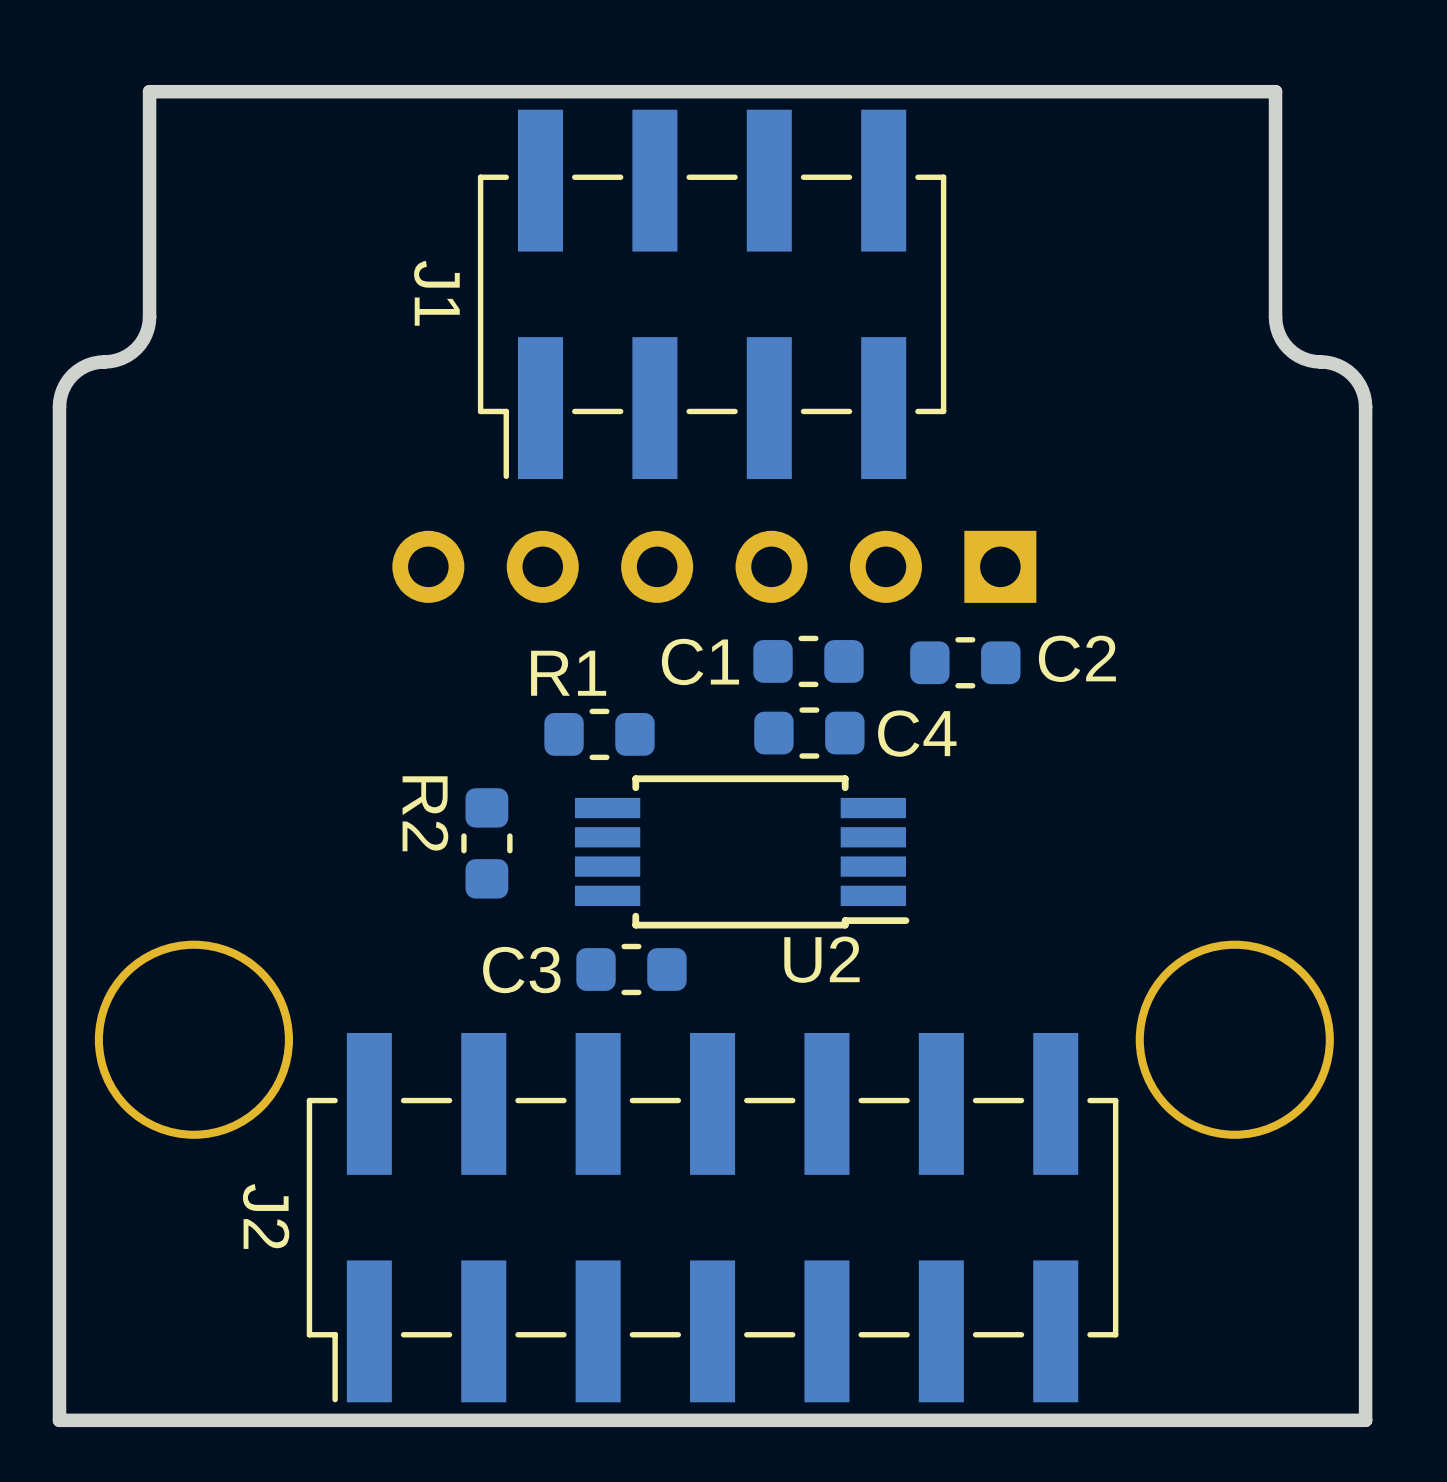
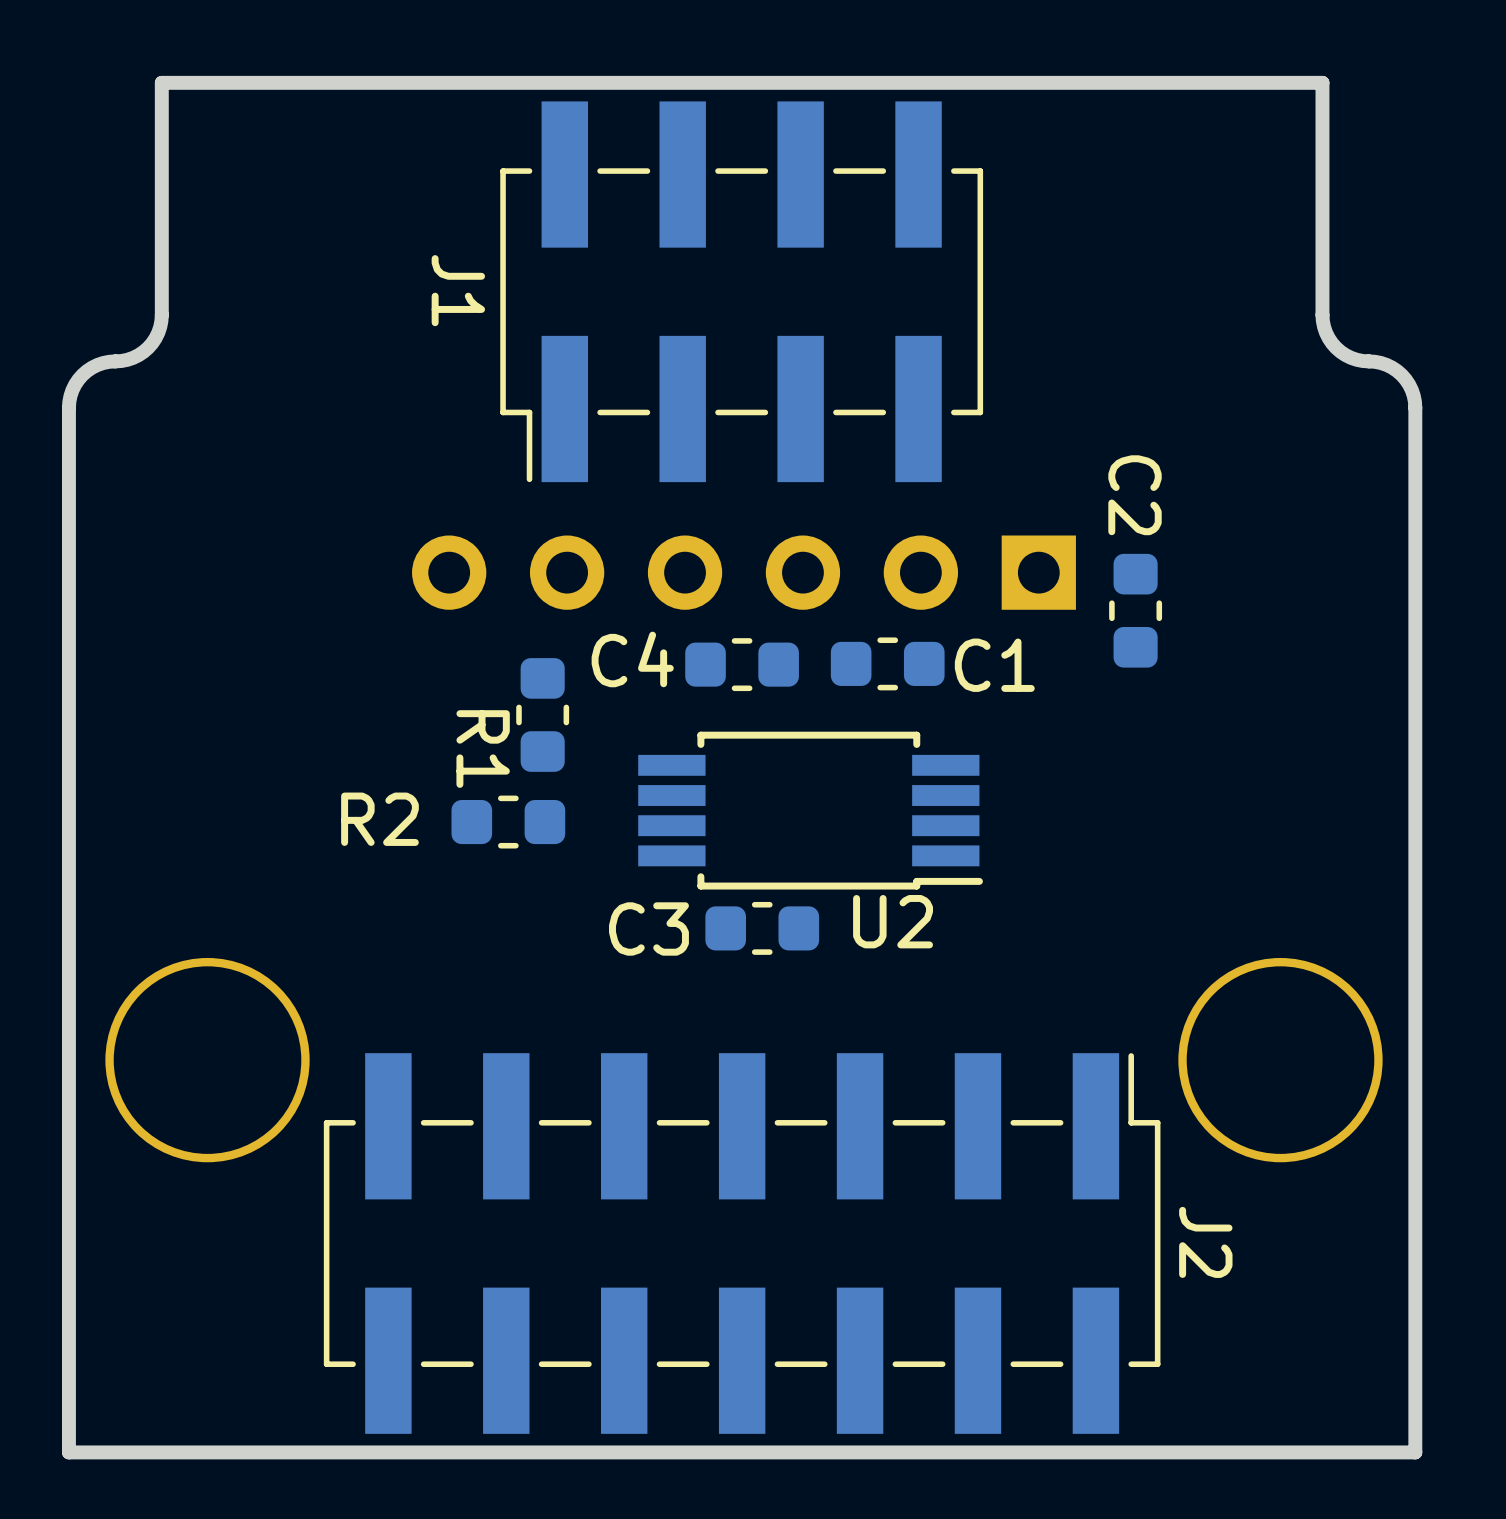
C2 name position: C2 (1077, 658) -> C2 (1135, 495)
C1 name position: C1 (700, 661) -> C1 (994, 665)
C1 position: (808, 661) -> (887, 663)
C2 rotation: 0° (965, 662) -> 90° clockwise (1135, 610)
C2 position: (965, 662) -> (1135, 610)
R1 name position: R1 (568, 673) -> R1 (483, 749)
C4 position: (809, 733) -> (742, 664)
C4 name position: C4 (917, 733) -> C4 (632, 659)
R1 rotation: 0° (599, 734) -> 90° clockwise (542, 714)
R1 position: (599, 734) -> (542, 714)
R2 rotation: 0° (486, 843) -> 90° clockwise (508, 822)
U2 position: (742, 851) -> (810, 810)
C3 position: (631, 969) -> (762, 928)
J2 rotation: 0° (712, 1217) -> 180° (742, 1243)

